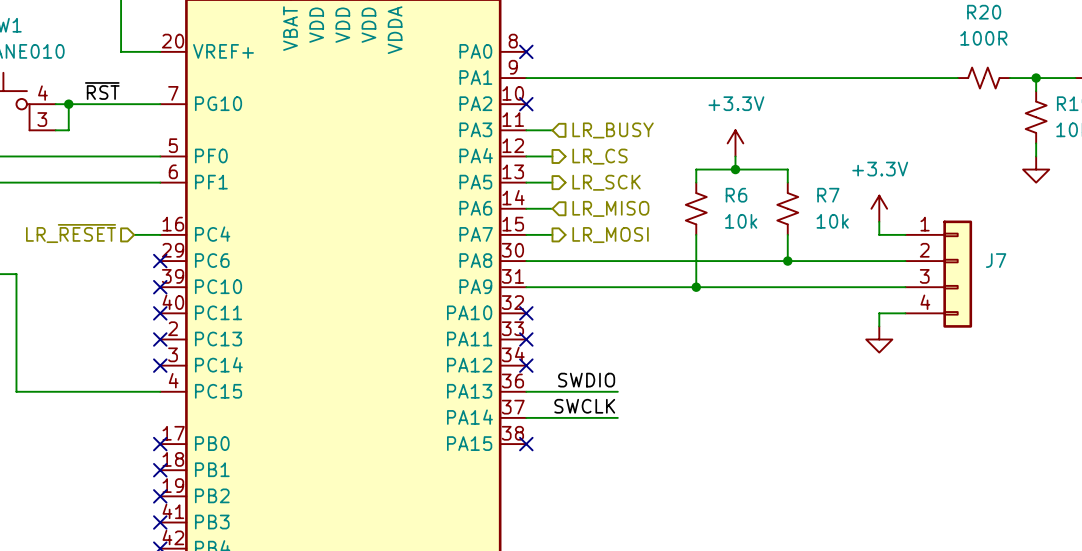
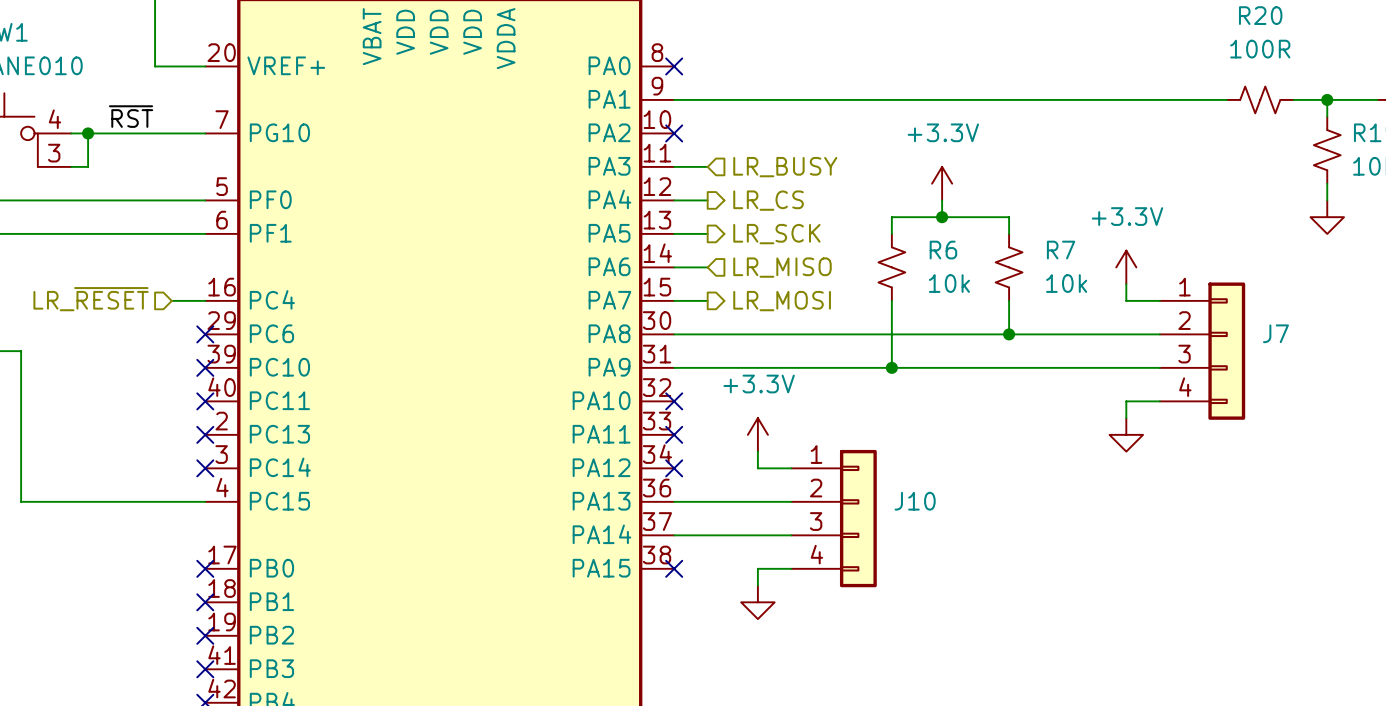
power symbol: none -> +3.3V (757, 434)
wire: none -> (757, 451) (757, 468) (791, 468)
label: SWDIO (586, 380) -> none
J10: none -> (834, 518)
label: SWCLK (584, 406) -> none
wire: none -> (791, 568) (757, 568) (757, 585)
power symbol: none -> (757, 602)

